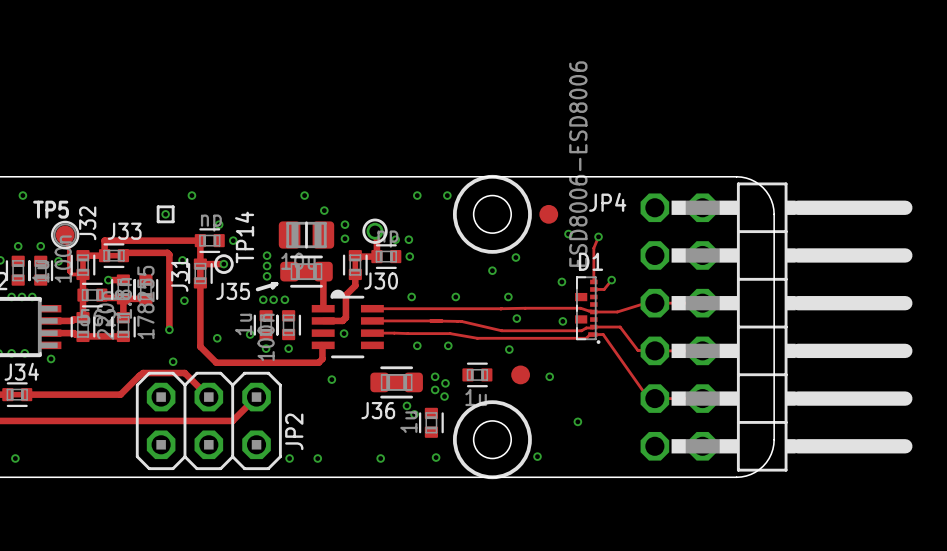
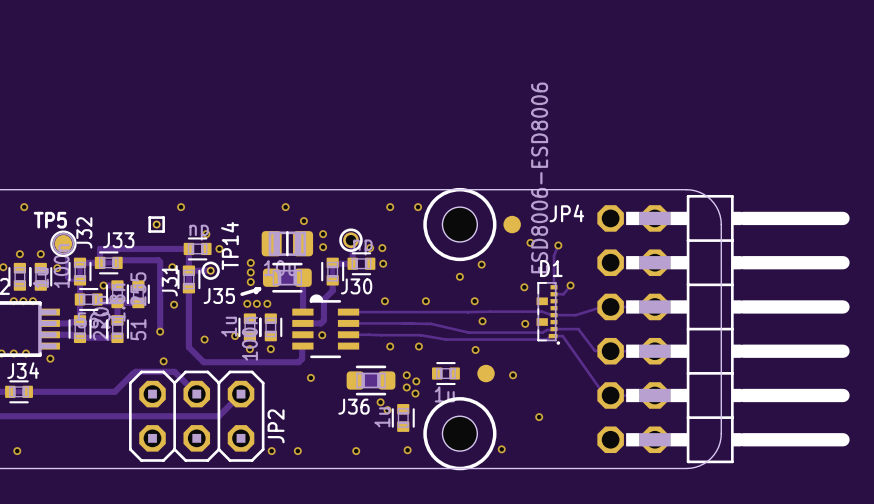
part value: 178 (145, 321) -> 51 (138, 329)

